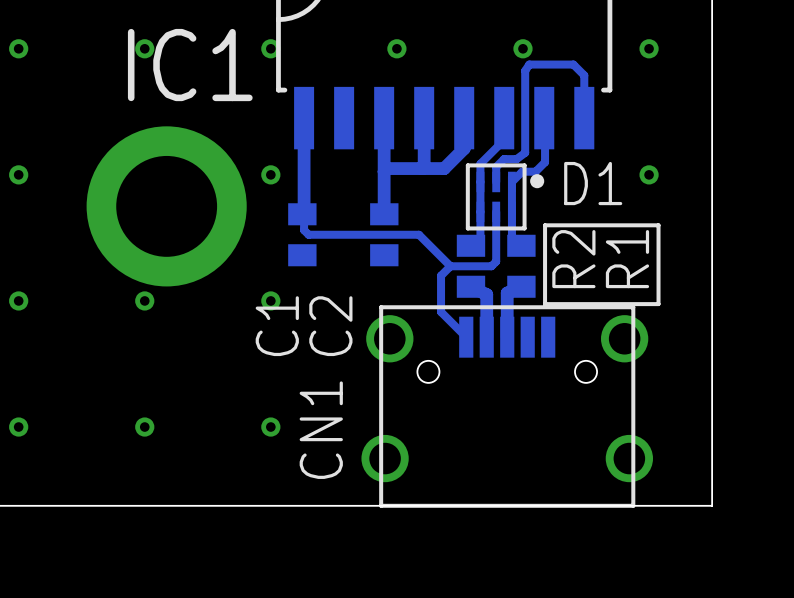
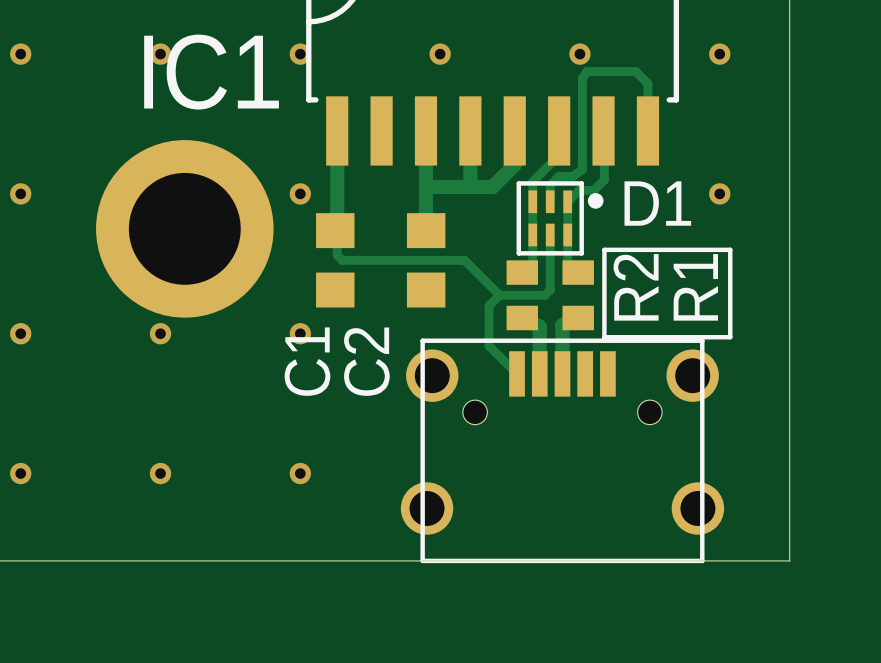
C1 footprint: [288, 203, 317, 267] -> [316, 213, 355, 308]
C2 footprint: [370, 203, 399, 267] -> [406, 213, 446, 308]
CN1 name: CN1 (321, 430) -> none

